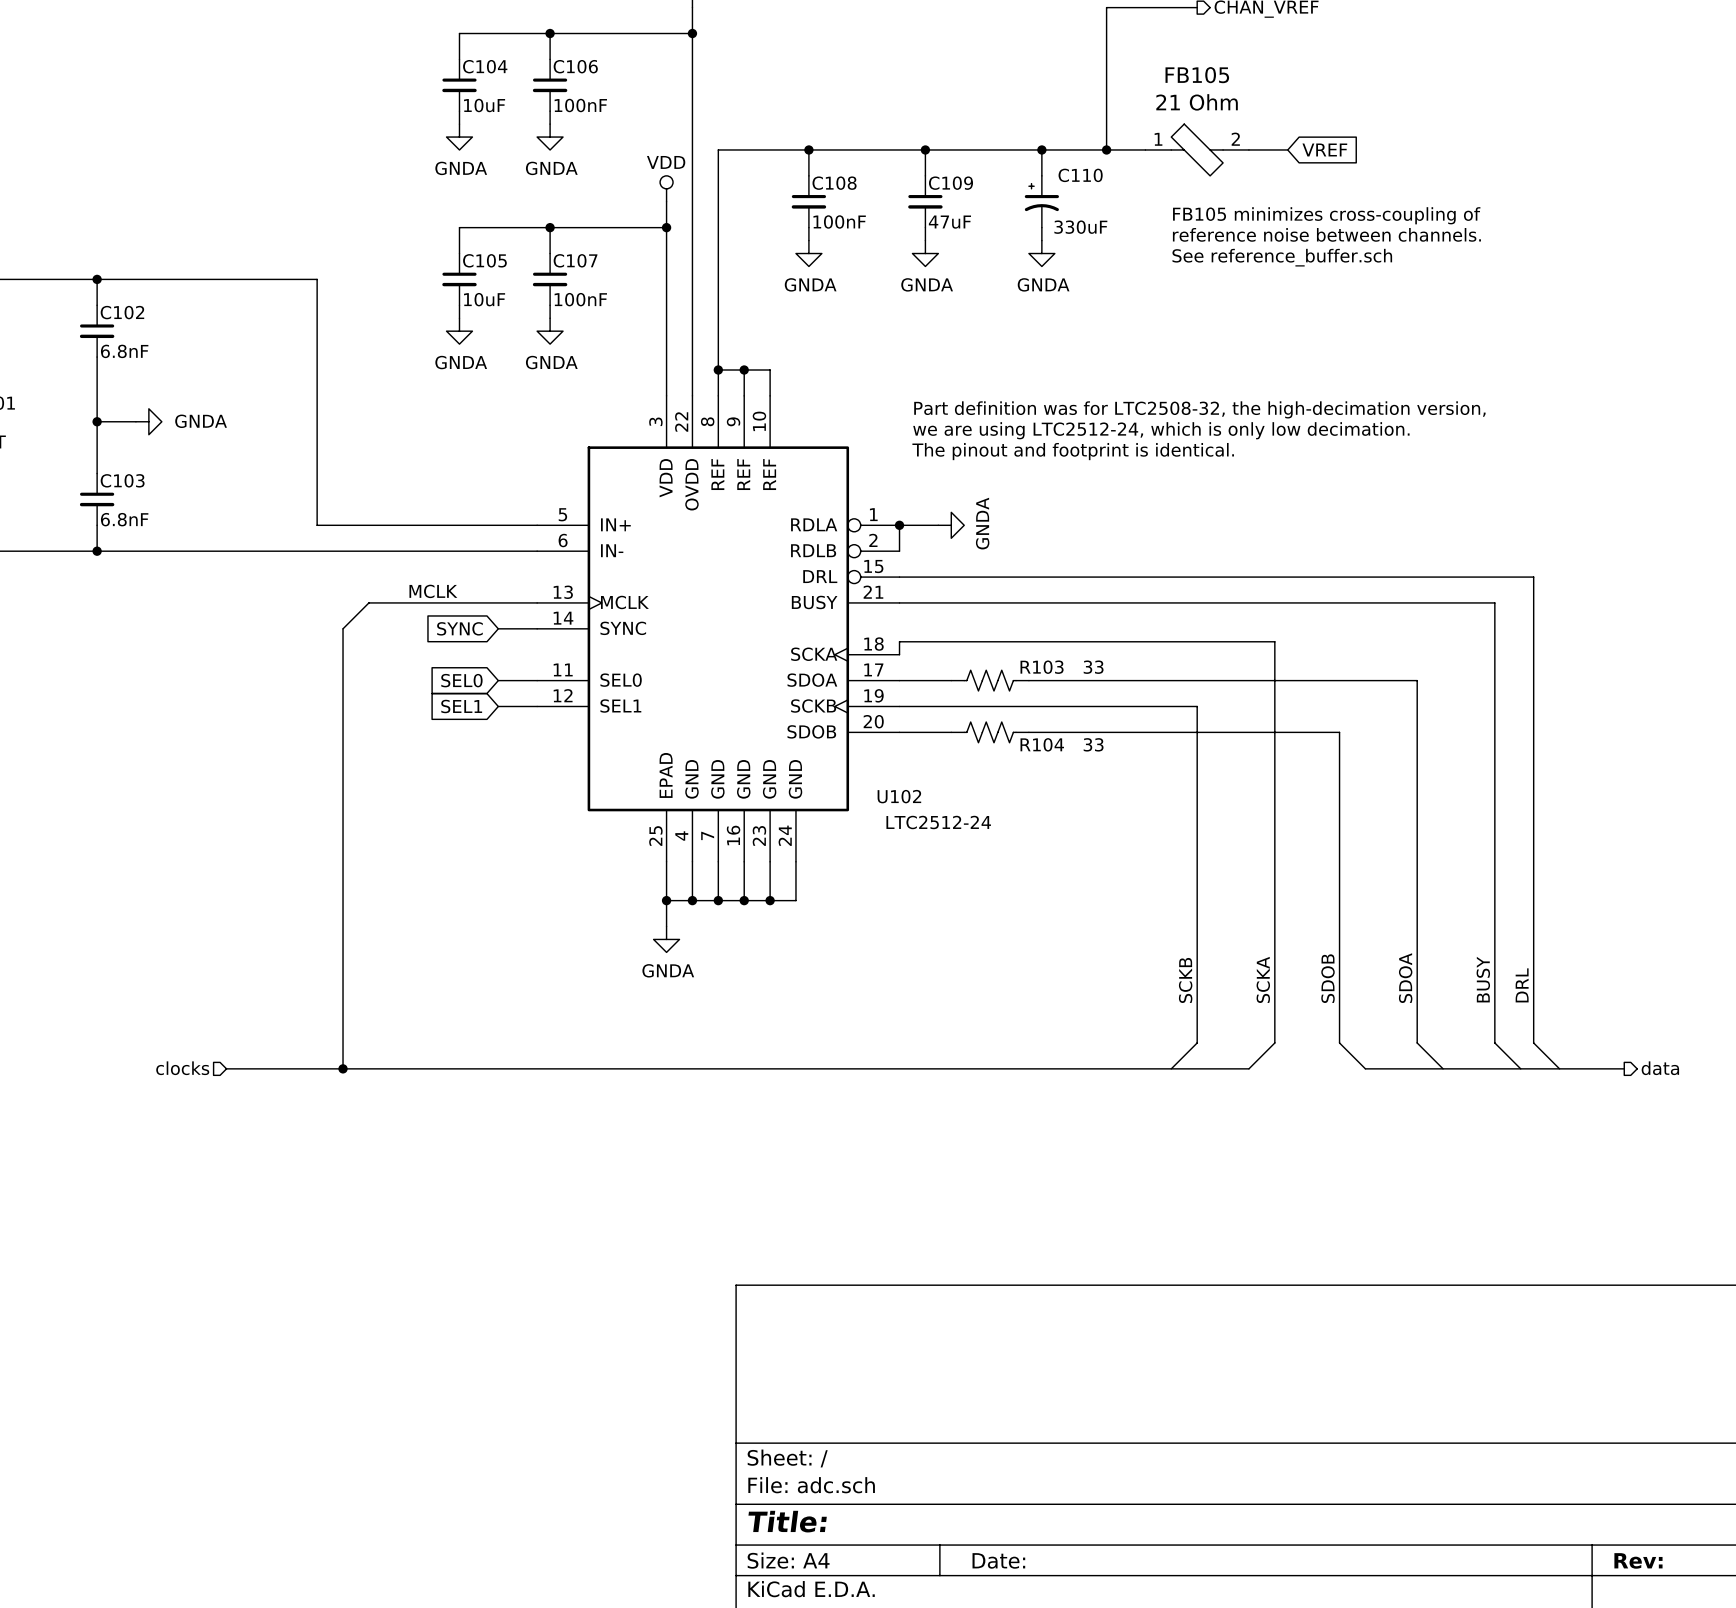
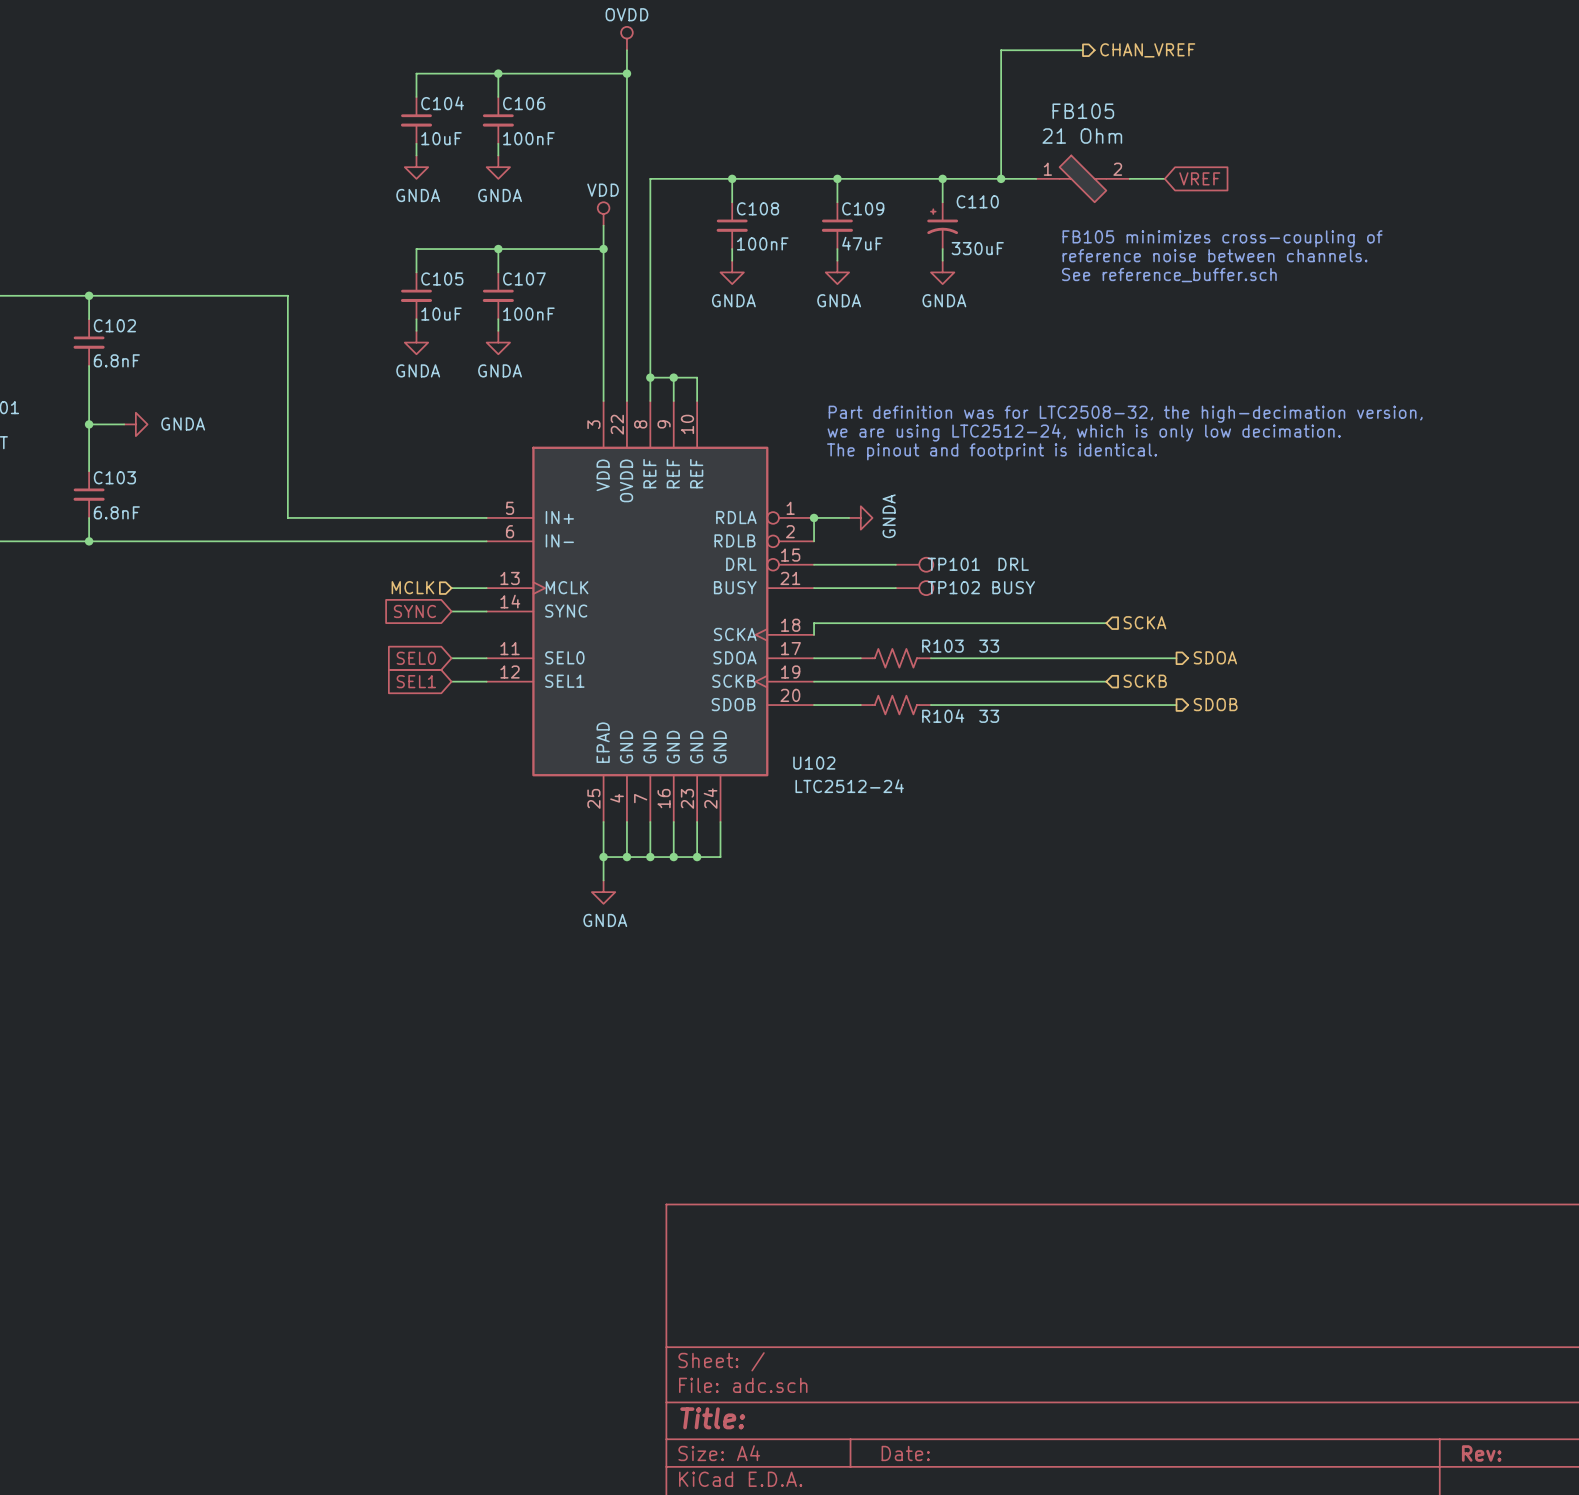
wire: (990, 577) (1533, 577) (1533, 1042) (1559, 1068) -> none
TP101: none -> DRL (914, 564)
label: MCLK (433, 591) -> none
hierarchical label: none -> MCLK (412, 587)
wire: (498, 602) (368, 602) (343, 628) -> none
wire: (990, 602) (1494, 602) (1494, 1042) (1520, 1068) -> none
TP102: none -> BUSY (914, 588)
bus: (343, 628) (343, 1068) -> none
wire: (1223, 641) (1274, 641) (1274, 1042) (1248, 1068) -> none
hierarchical label: none -> SCKA (1144, 622)
wire: (1300, 680) (1417, 680) (1417, 1042) (1443, 1068) -> none
hierarchical label: none -> SDOA (1215, 657)
wire: (1197, 706) (1197, 1042) (1171, 1068) -> (1082, 681) (1106, 681)
hierarchical label: none -> SCKB (1145, 681)
hierarchical label: none -> SDOB (1215, 704)
wire: (1300, 732) (1339, 732) (1339, 1042) (1365, 1068) -> none
label: SDOB (1328, 978) -> none
label: SDOA (1405, 978) -> none
label: SCKA (1263, 979) -> none
label: BUSY (1483, 979) -> none
label: SCKB (1185, 980) -> none
label: DRL (1522, 985) -> none
hierarchical label: clocks (182, 1068) -> none
bus: (226, 1068) (1248, 1068) -> none
junction: (343, 1068) -> none
bus: (1365, 1068) (1624, 1068) -> none
hierarchical label: data (1660, 1068) -> none

